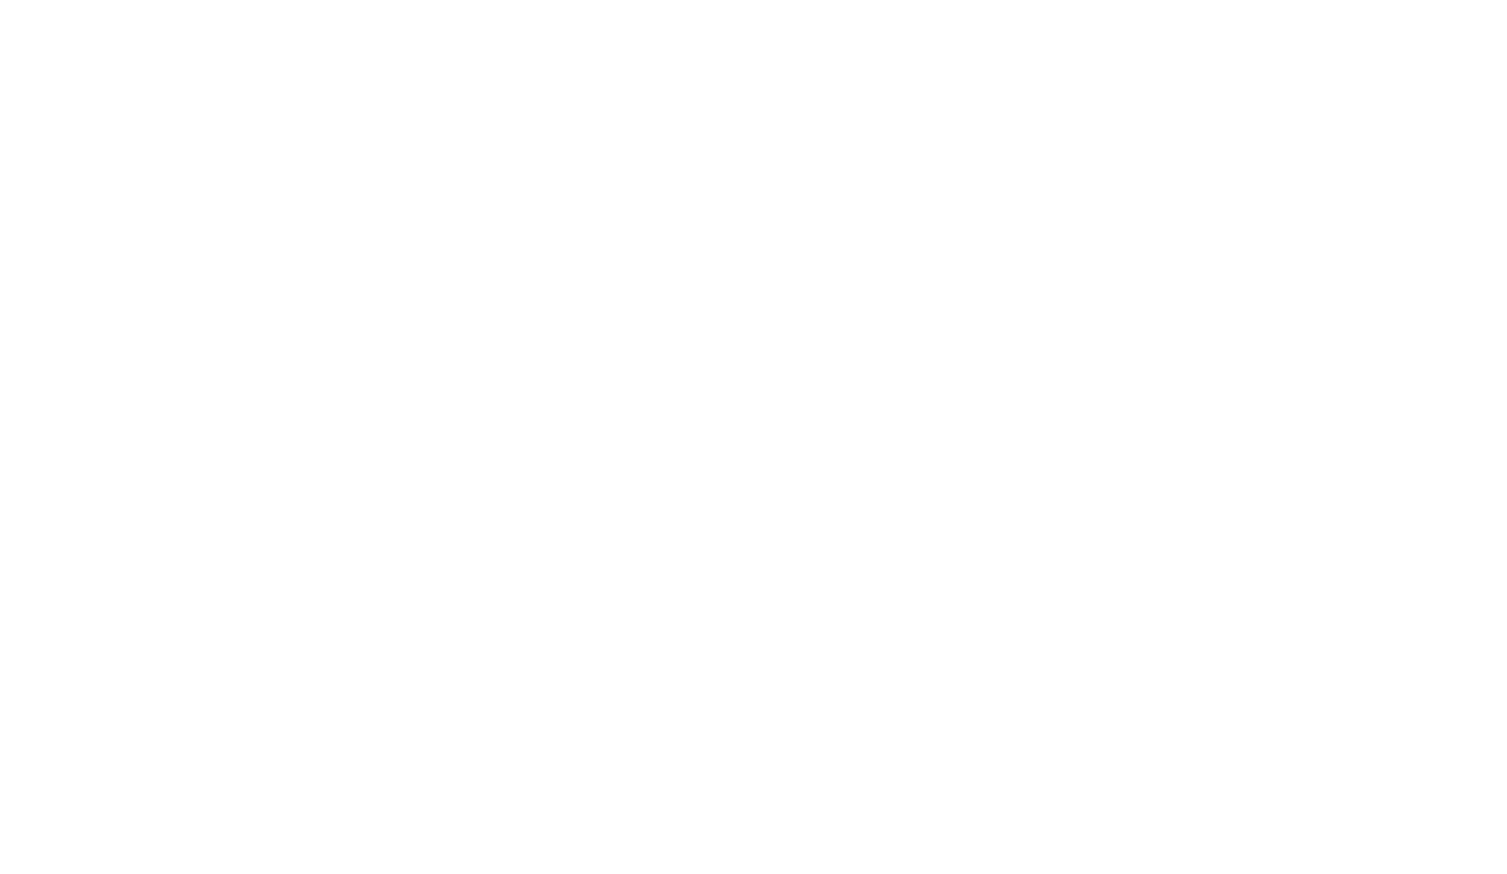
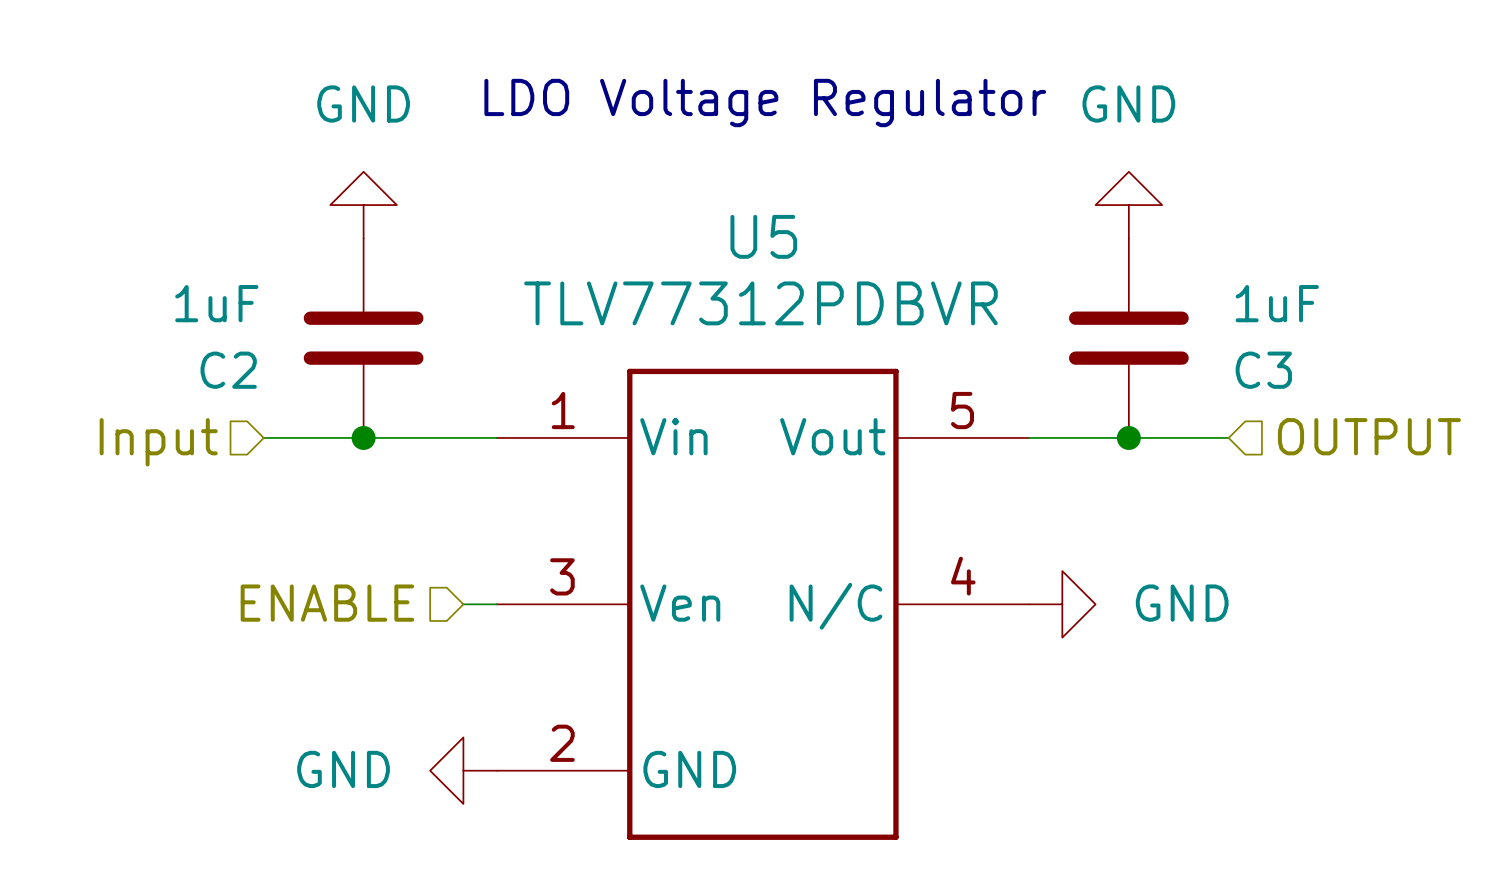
text: none -> LDO Voltage Regulator (765, 103)
power symbol: none -> GND (363, 205)
power symbol: none -> GND (1128, 205)
C2: none -> 1uF (363, 338)
C3: none -> 1uF (1128, 338)
hierarchical label: none -> OUTPUT (1369, 436)
wire: none -> (263, 437) (496, 437)
junction: none -> (363, 437)
wire: none -> (1029, 437) (1228, 437)
junction: none -> (1128, 437)
hierarchical label: none -> Input (158, 442)
hierarchical label: none -> ENABLE (327, 603)
wire: none -> (463, 604) (496, 604)
U5: none -> TLV77312PDBVR (762, 604)
power symbol: none -> GND (1062, 604)
power symbol: none -> GND (463, 770)

